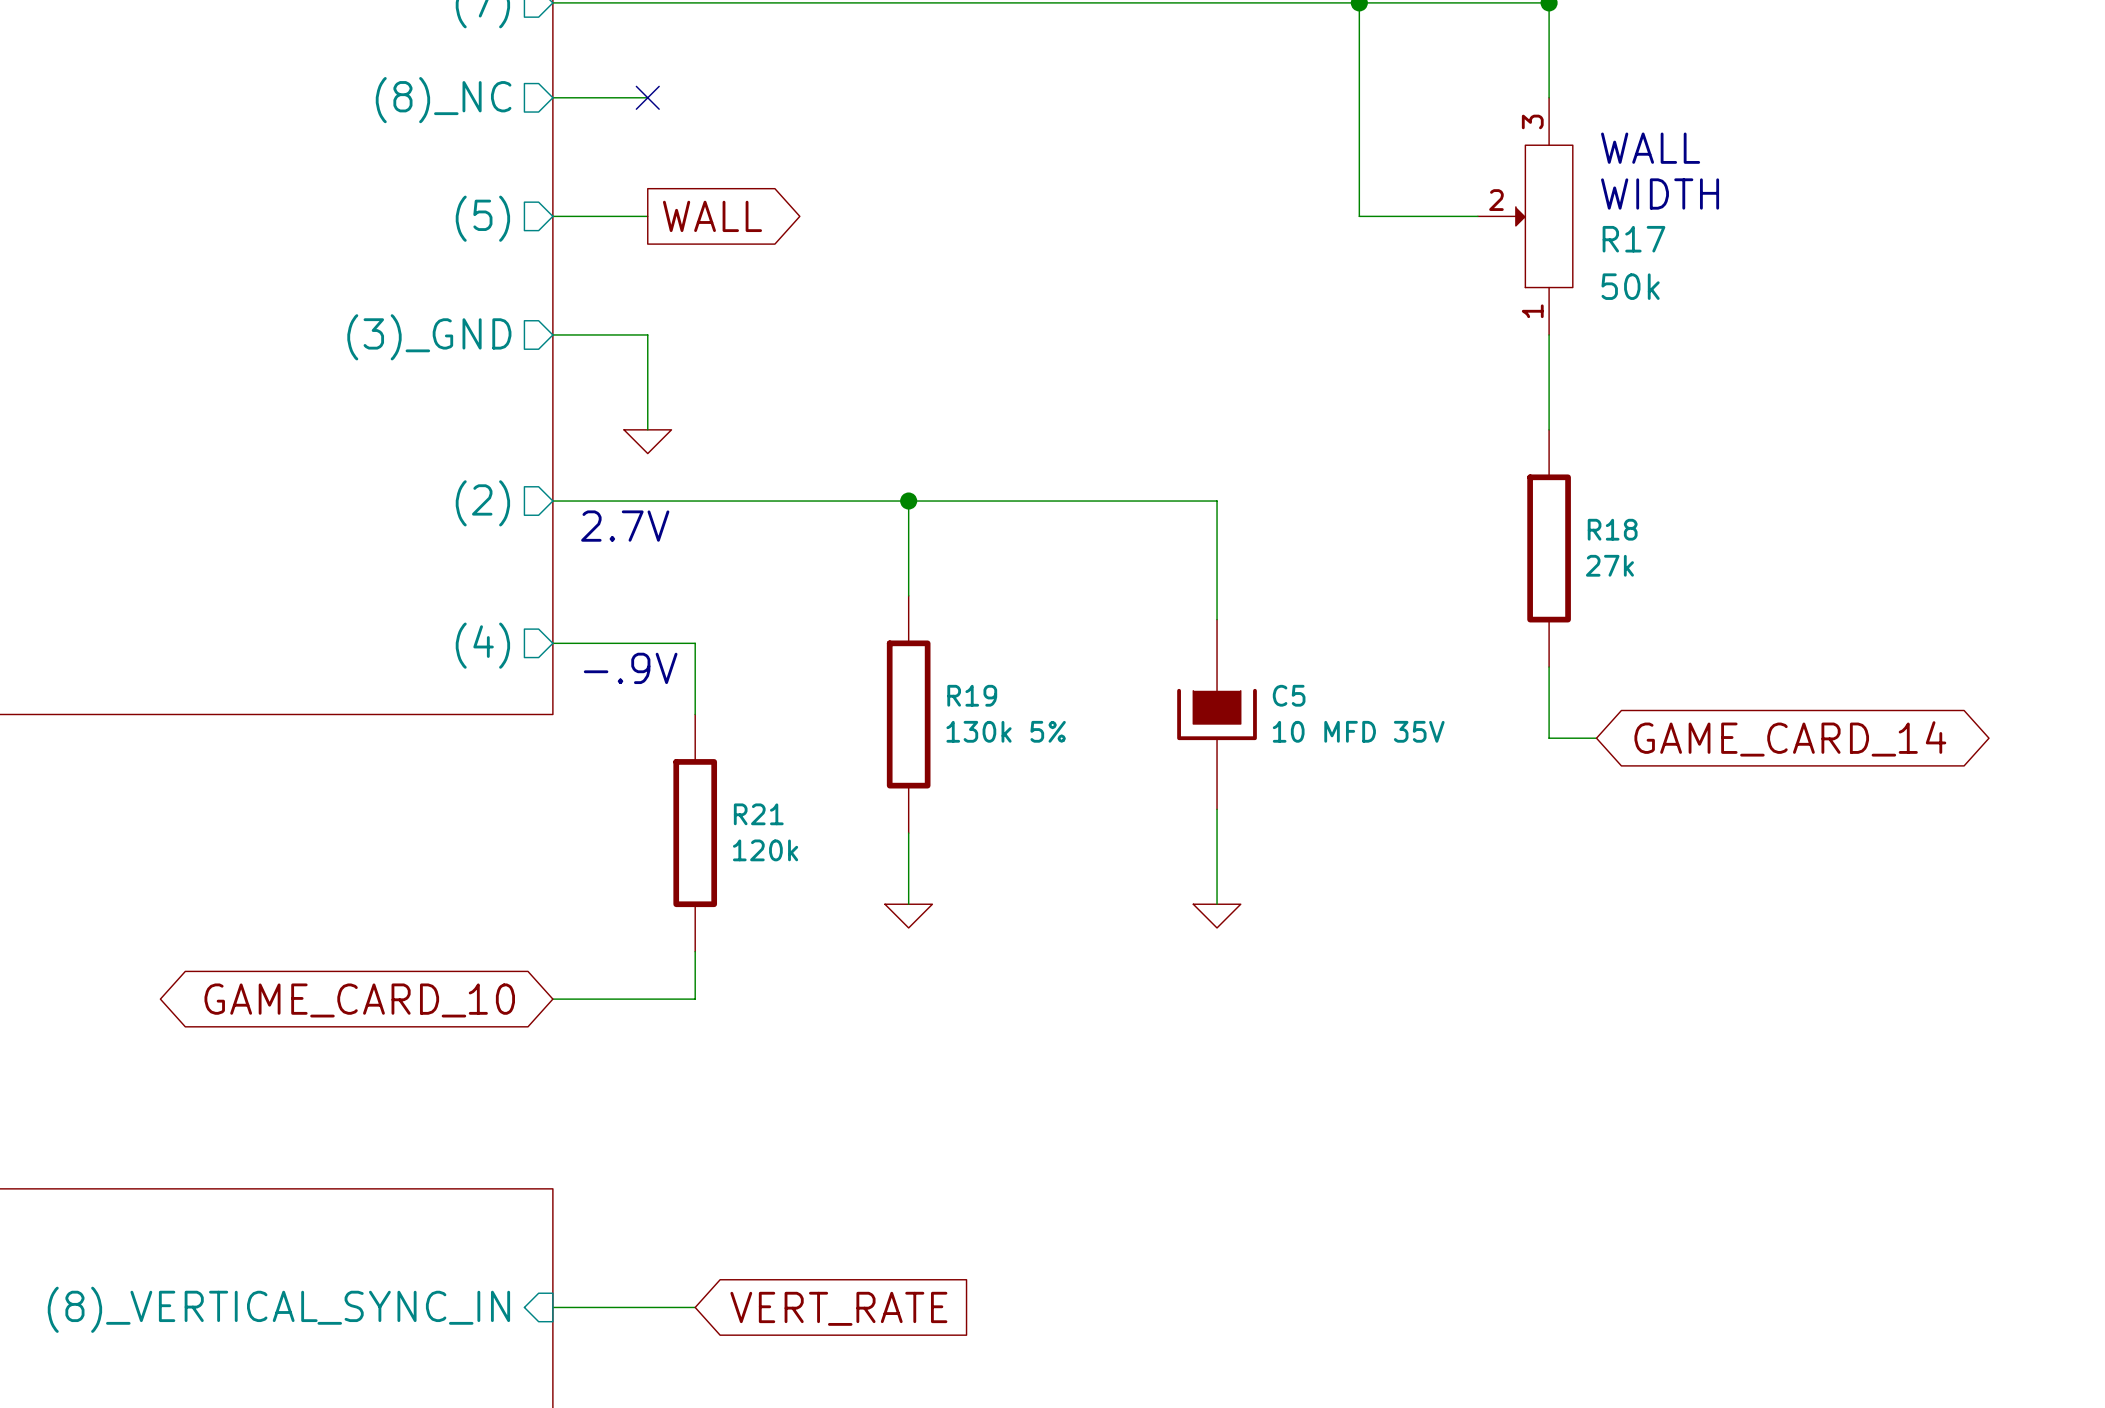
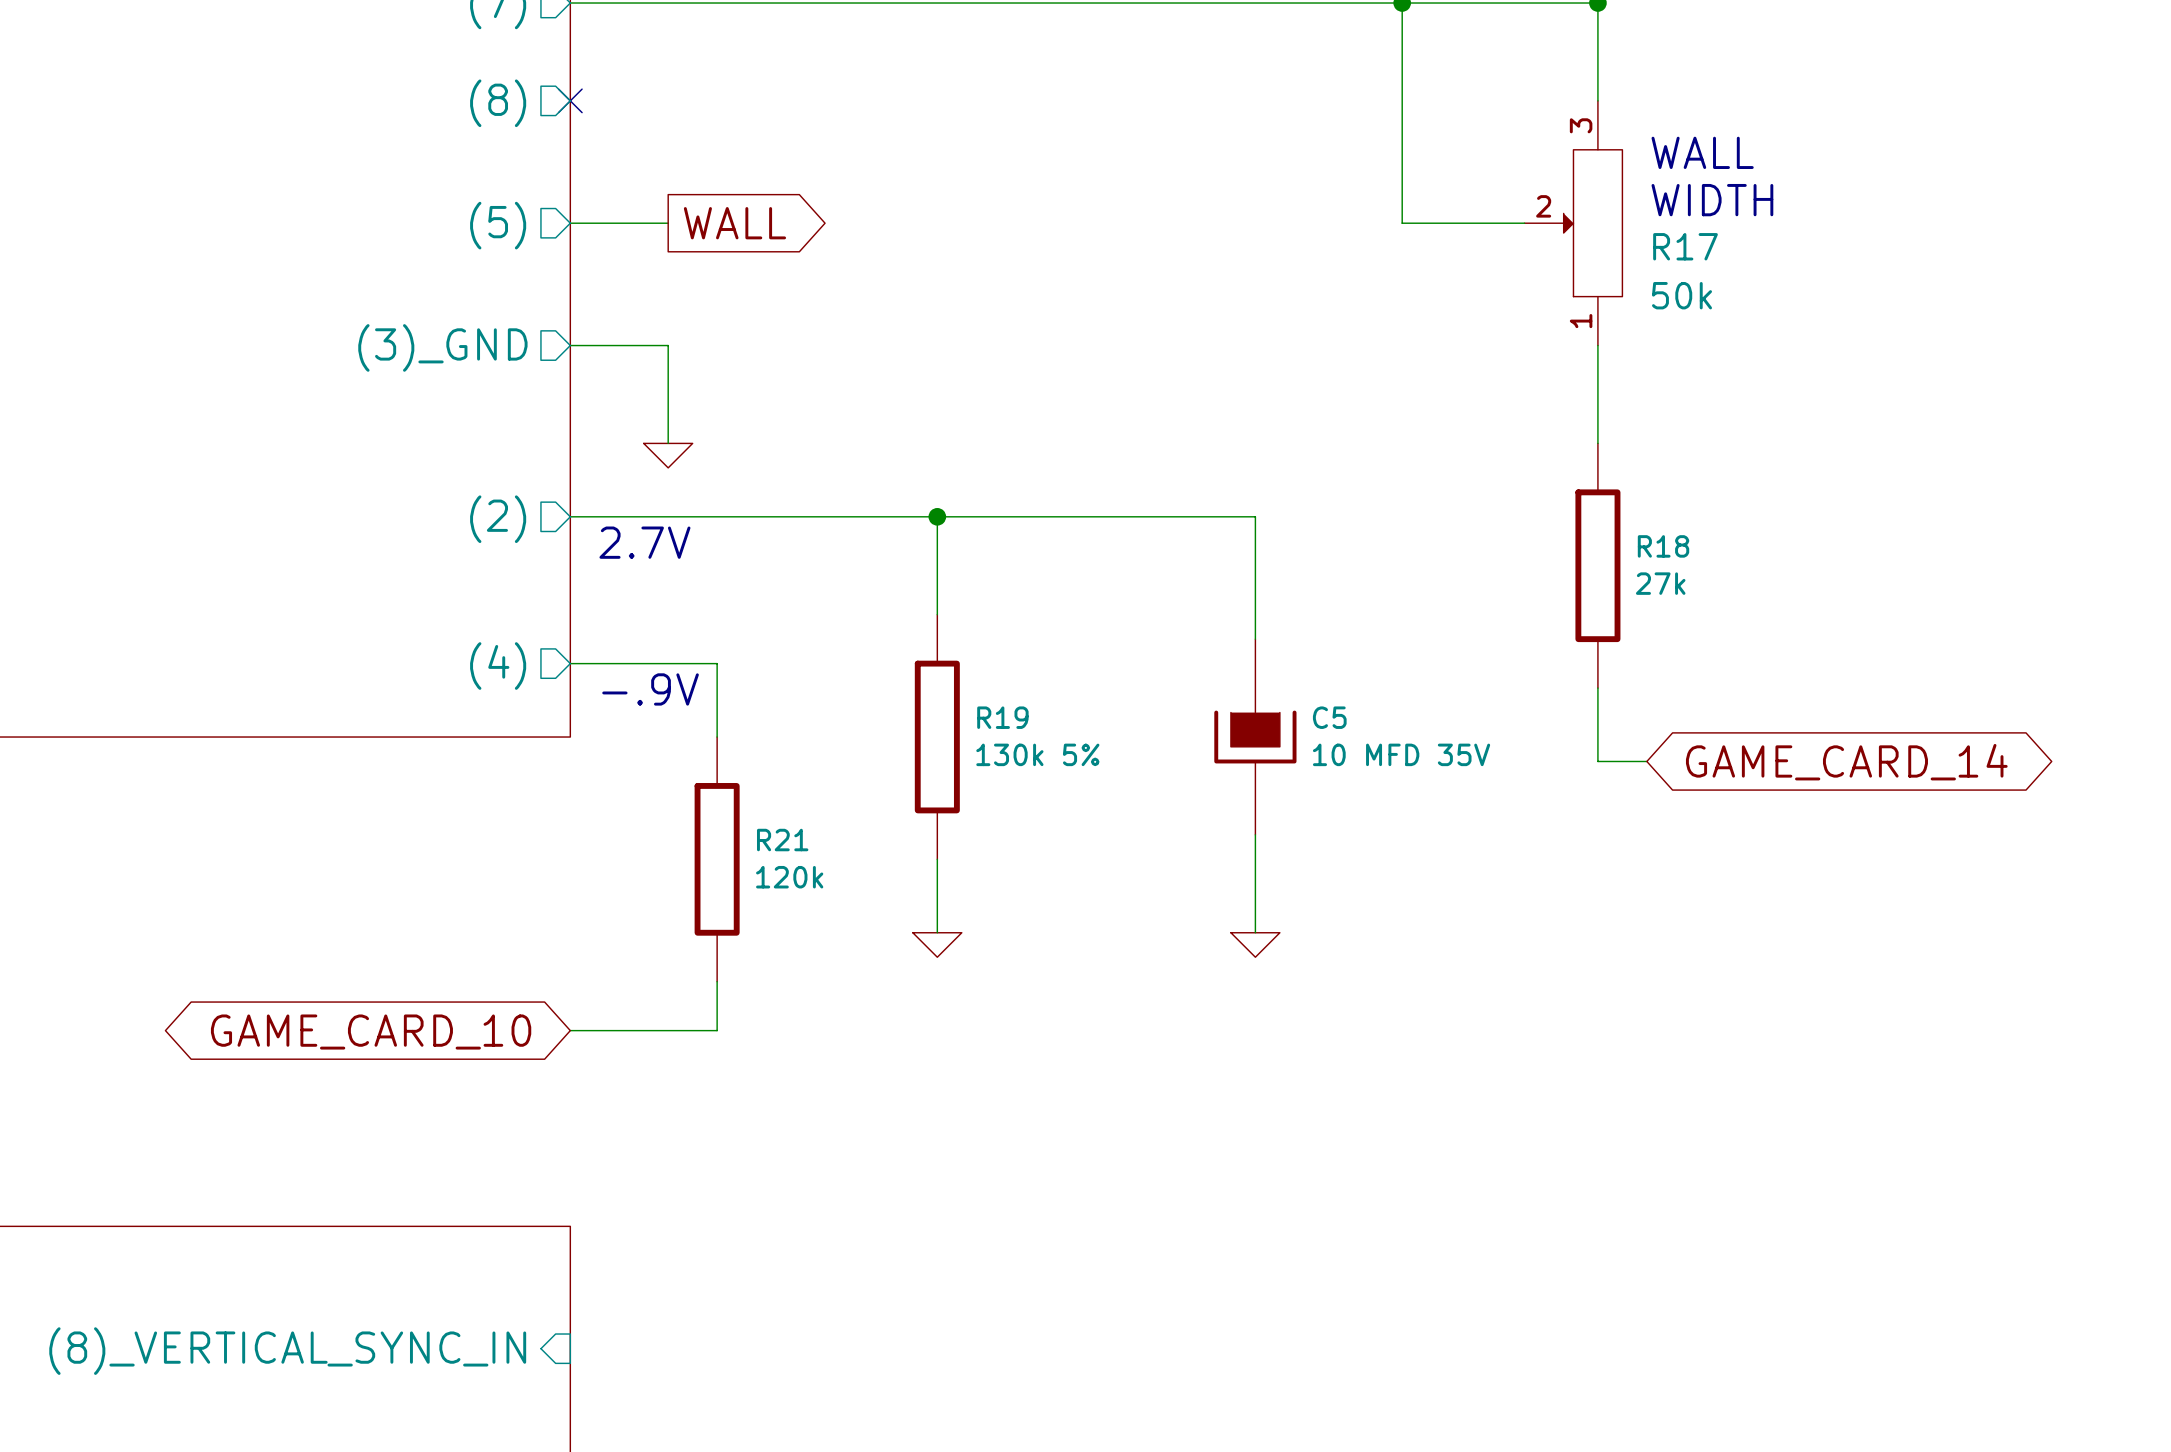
wire: (552, 97) (647, 97) -> none
no-connect mark position: (647, 97) -> (570, 100)
sheet pin: (8)_NC (443, 100) -> (8) (498, 103)
wire: (552, 1307) (695, 1307) -> none
global label: VERT_RATE (838, 1308) -> none

